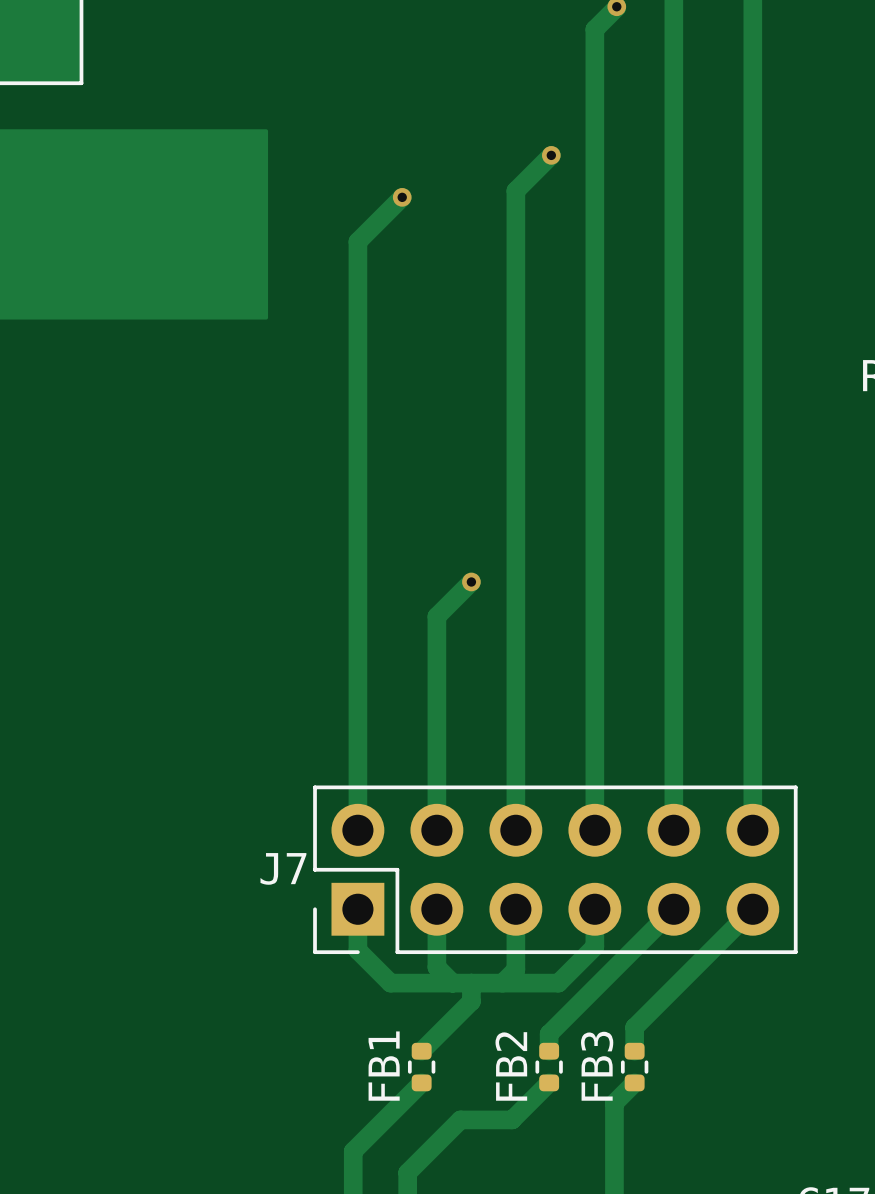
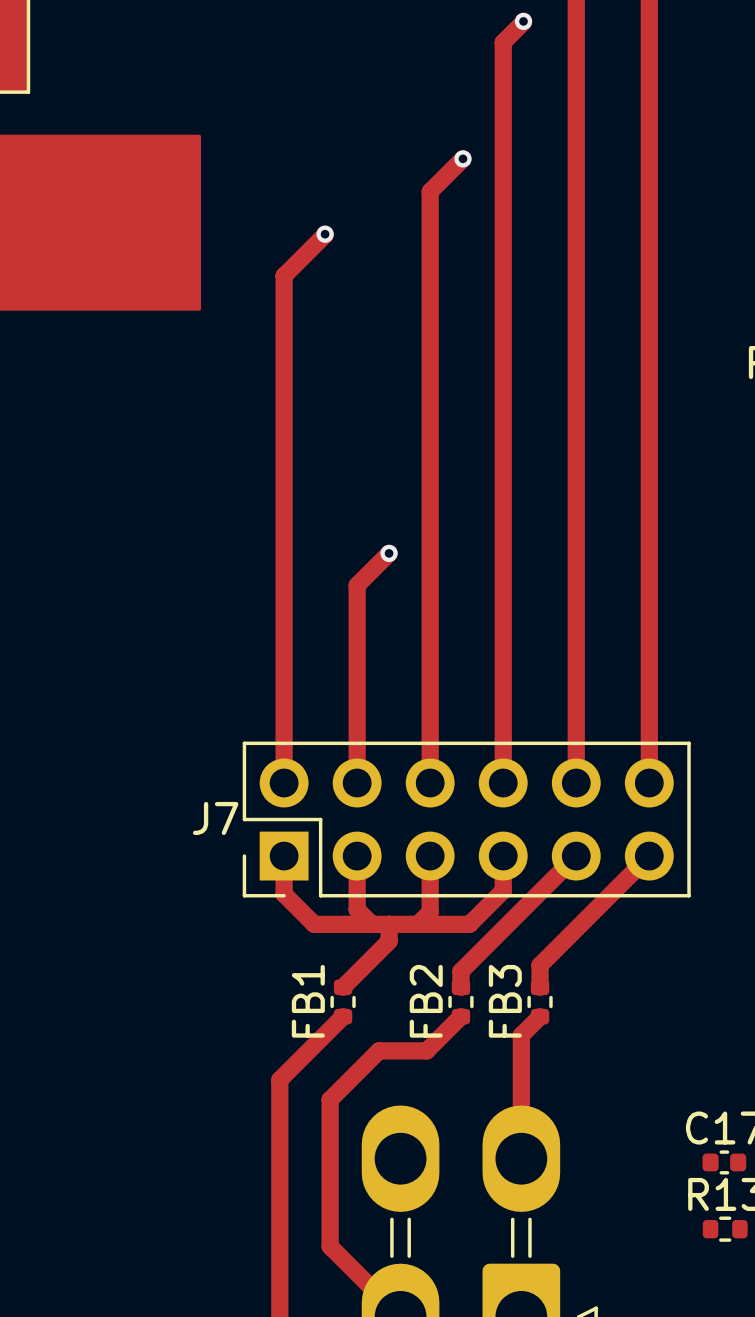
track: (402, 197) (357, 241) (357, 281) -> (325, 234) (284, 275)
via position: (402, 197) -> (325, 234)

